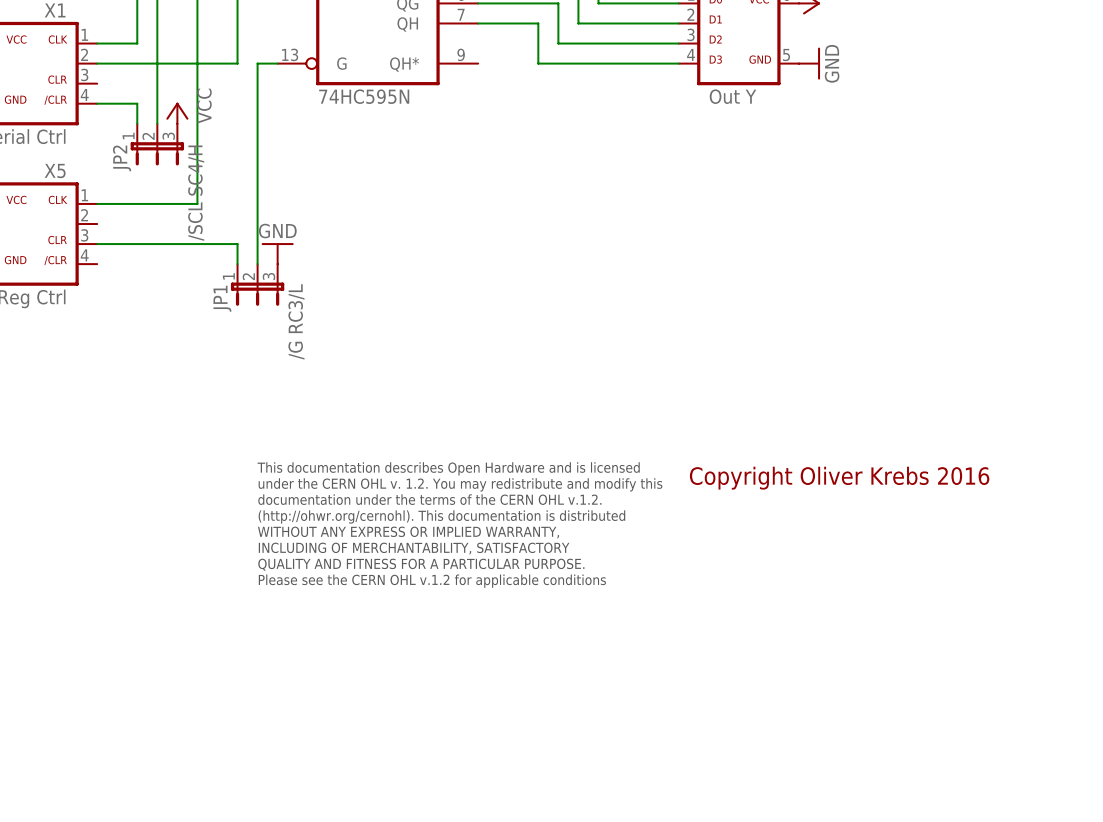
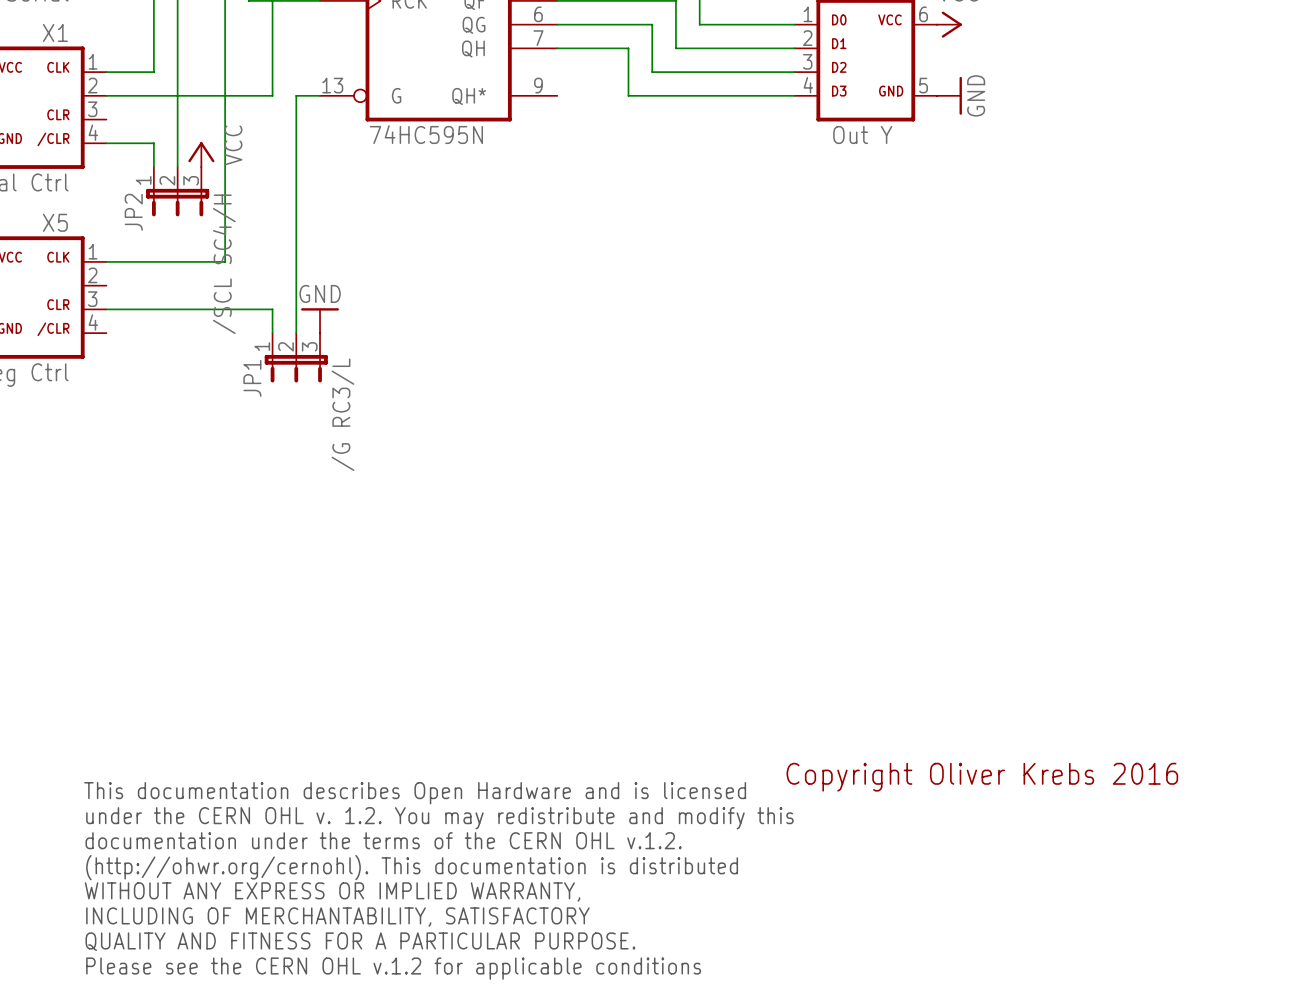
text: This documentation describes Open Hardware and is licensed (448, 468) -> none
text position: Copyright Oliver Krebs 2016 (839, 478) -> Copyright Oliver Krebs 2016 (982, 777)
text: under the CERN OHL v. 1.2. You may redistribute and modify this (460, 484) -> none
text: documentation under the terms of the CERN OHL v.1.2. (429, 499) -> none
text: (http://ohwr.org/cernohl). This documentation is distributed (441, 516) -> none
text: WITHOUT ANY EXPRESS OR IMPLIED WARRANTY, (408, 532) -> none
text: INCLUDING OF MERCHANTABILITY, SATISFACTORY (414, 548) -> none
text: QUALITY AND FITNESS FOR A PARTICULAR PURPOSE. (421, 564) -> none
text: Please see the CERN OHL v.1.2 for applicable conditions (432, 581) -> none
text: none -> This documentation describes Open Hardware and is licensed (415, 793)
text: none -> under the CERN OHL v. 1.2. You may redistribute and modify this (439, 818)
text: none -> documentation under the terms of the CERN OHL v.1.2. (383, 840)
text: none -> (http://ohwr.org/cernohl). This documentation is distributed (412, 867)
text: none -> WITHOUT ANY EXPRESS OR IMPLIED WARRANTY, (332, 891)
text: none -> INCLUDING OF MERCHANTABILITY, SATISFACTORY (337, 917)
text: none -> QUALITY AND FITNESS FOR A PARTICULAR PURPOSE. (360, 941)
text: none -> Please see the CERN OHL v.1.2 for applicable conditions (393, 968)

